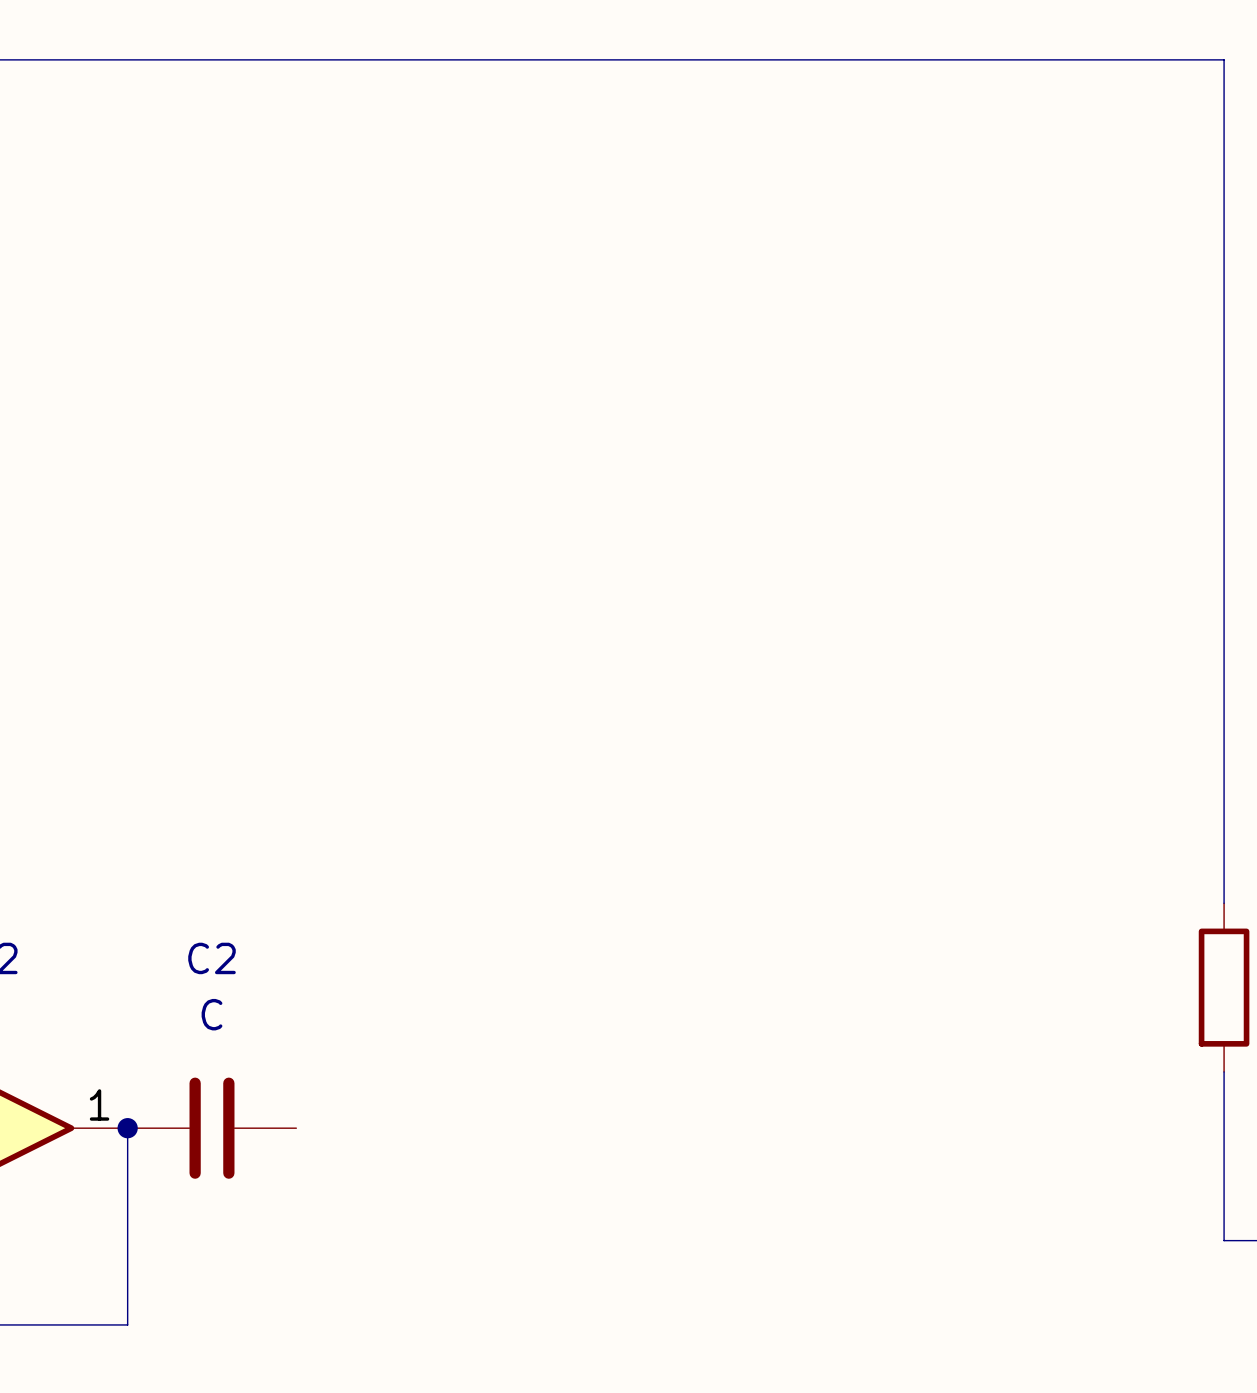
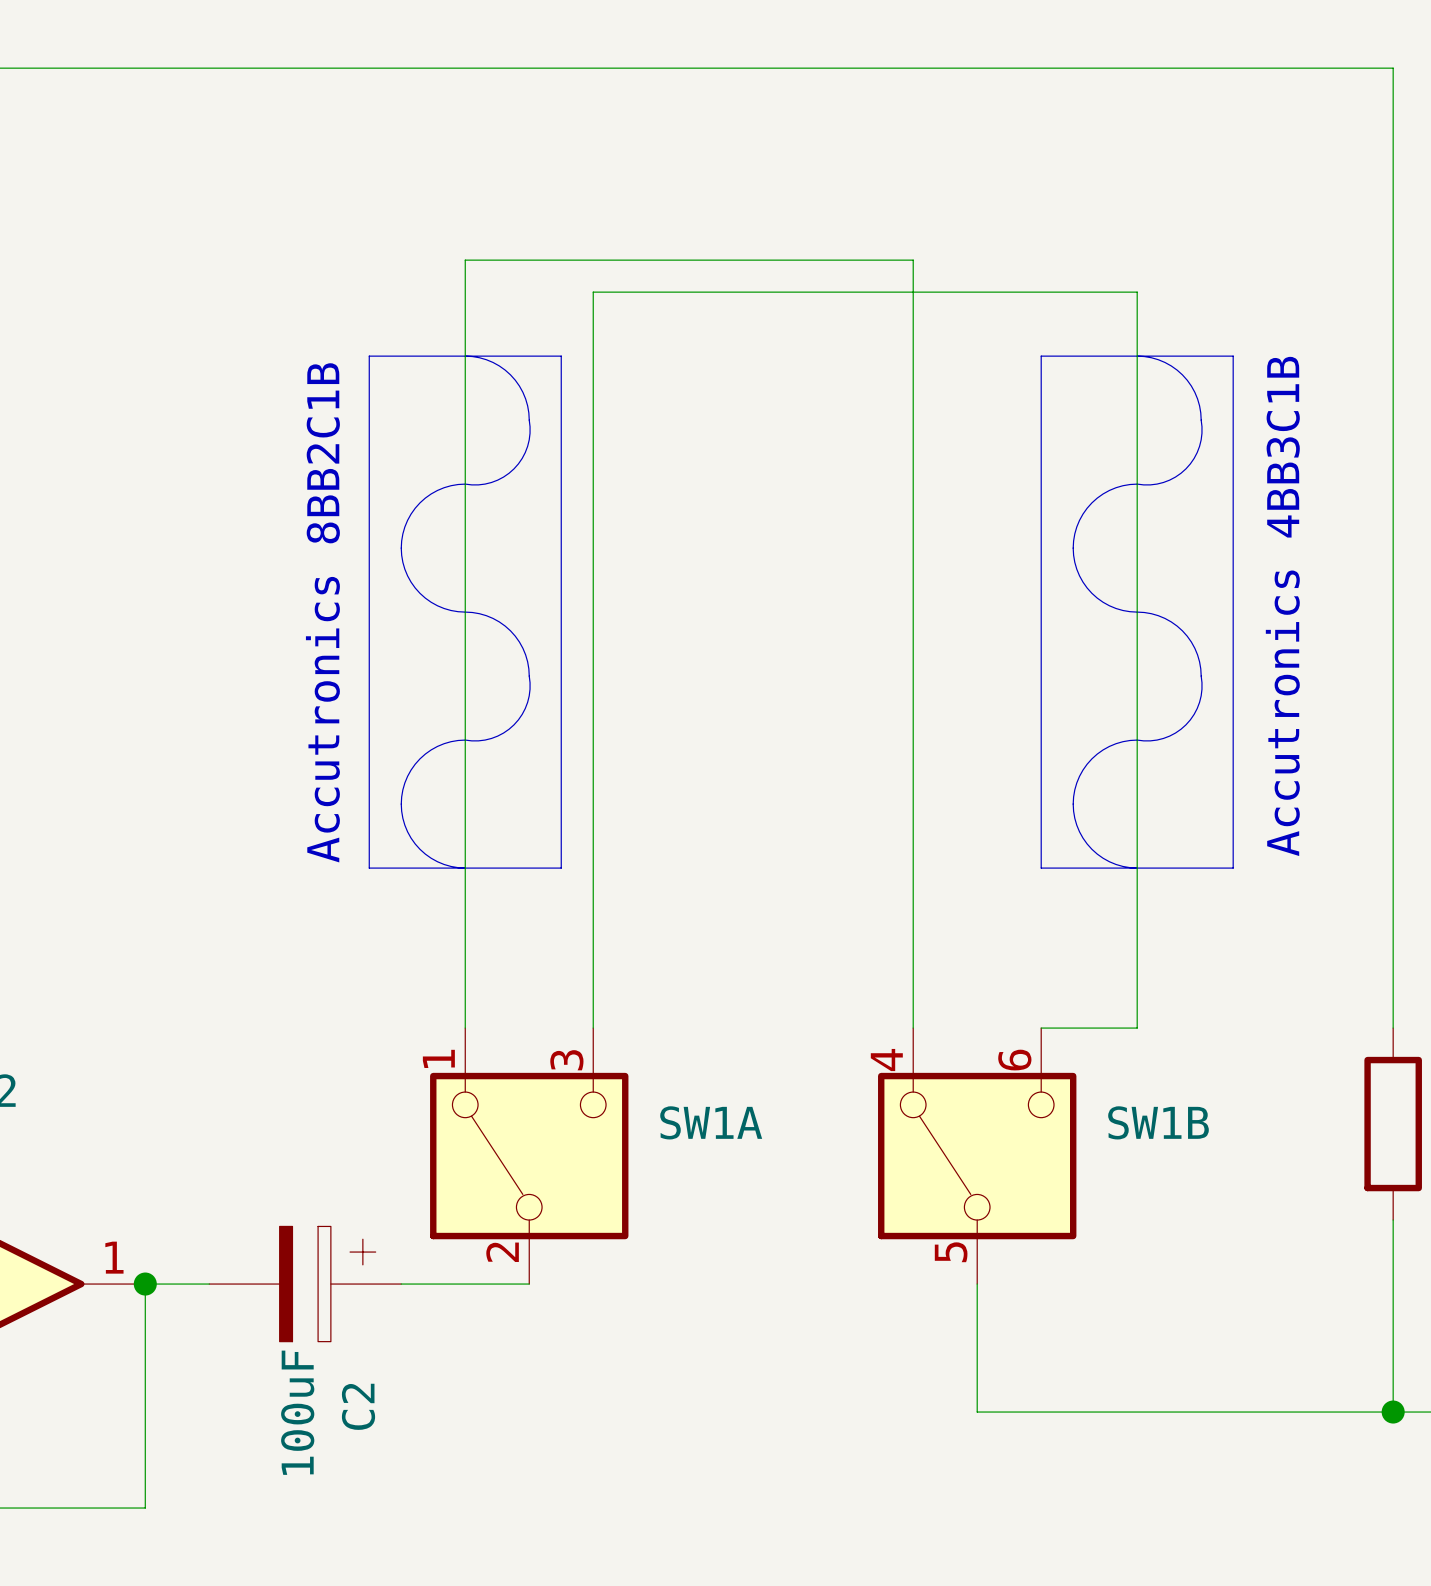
line: none -> (369, 356) (561, 356) (561, 868) (369, 868) (369, 356)
line: none -> (465, 356) (479, 357) (493, 362) (510, 374) (519, 386) (525, 398) (530, 426) (529, 439) (525, 452) (514, 468) (503, 477) (491, 482) (451, 485) (431, 493) (420, 502) (411, 514) (404, 526) (401, 540) (401, 555) (404, 569) (411, 582) (420, 593) (431, 602) (444, 608) (479, 613) (499, 621) (510, 630) (519, 642) (527, 661) (529, 695) (525, 708) (514, 724) (503, 733) (491, 738) (478, 740) (458, 740) (437, 746) (425, 754) (415, 764) (404, 782) (401, 796) (402, 818) (407, 831) (415, 843) (425, 854) (437, 861) (451, 866) (465, 868)
line: none -> (1041, 356) (1233, 356) (1233, 868) (1041, 868) (1041, 356)
line: none -> (1137, 356) (1151, 357) (1164, 362) (1177, 370) (1191, 386) (1197, 398) (1200, 412) (1201, 433) (1199, 446) (1194, 458) (1185, 468) (1169, 480) (1157, 484) (1130, 484) (1116, 487) (1103, 493) (1091, 502) (1083, 514) (1076, 526) (1073, 540) (1074, 562) (1083, 582) (1091, 593) (1103, 602) (1122, 610) (1158, 615) (1171, 621) (1182, 630) (1191, 642) (1197, 654) (1201, 682) (1201, 695) (1197, 708) (1190, 719) (1180, 729) (1169, 736) (1157, 740) (1130, 740) (1109, 746) (1097, 754) (1087, 764) (1076, 782) (1073, 796) (1074, 818) (1079, 831) (1087, 843) (1097, 854) (1109, 861) (1122, 866) (1137, 868)
text: none -> Accutronics 4BB3C1B (1282, 606)
text: none -> Accutronics 8BB2C1B (322, 612)
wire: none -> (465, 1028) (465, 260) (913, 260) (913, 1028)
wire: none -> (593, 1028) (593, 292) (1137, 292) (1137, 1028) (1041, 1028)
C2 name position: C2 (211, 958) -> C2 (358, 1406)
C2 value: C (211, 1014) -> 100uF (297, 1412)
SW1A: none -> (529, 1156)
SW1B: none -> (977, 1156)
C2 symbol: [127, 1077, 297, 1179] -> [209, 1226, 402, 1342]
wire: none -> (401, 1284) (529, 1284)
wire: none -> (977, 1284) (977, 1412) (1393, 1412)
junction: none -> (1393, 1412)

